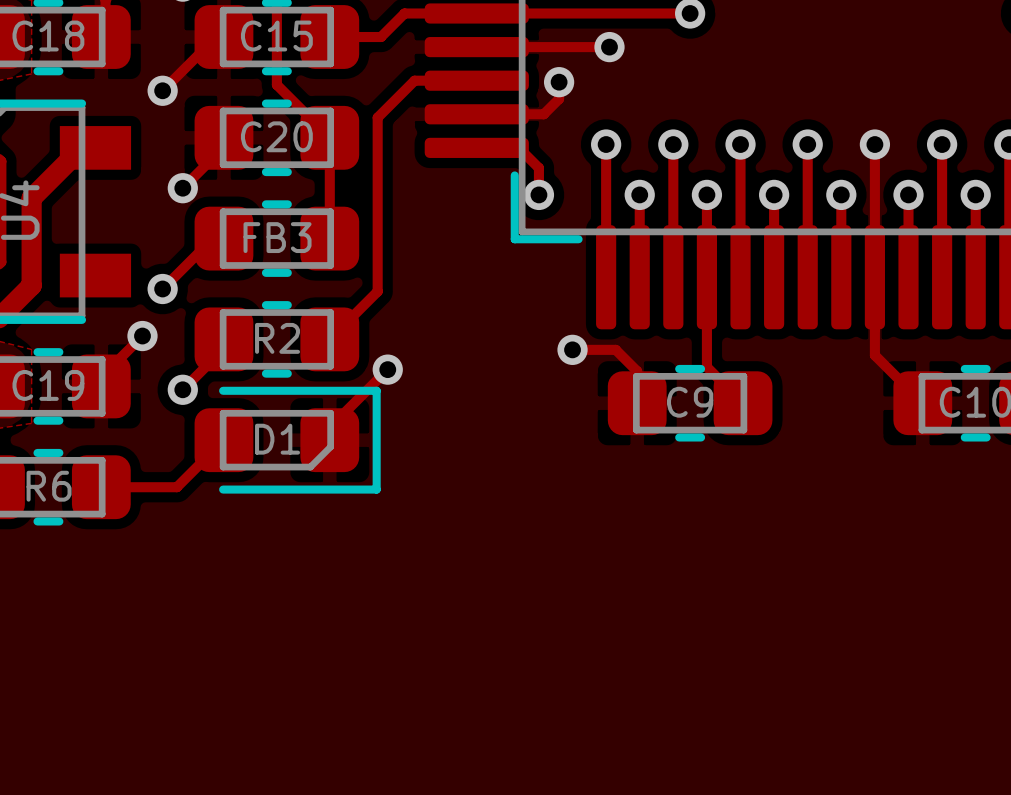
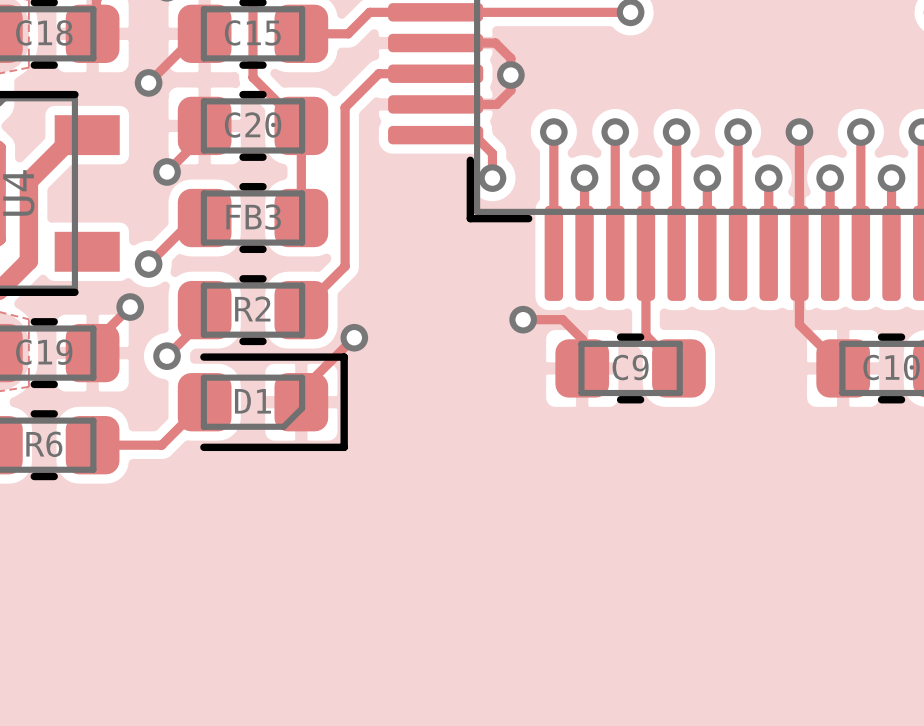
track: (542, 47) (609, 47) -> (495, 43) (510, 58) (510, 75)
via: (609, 47) -> none

